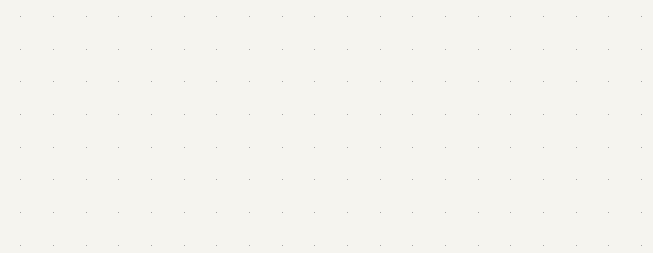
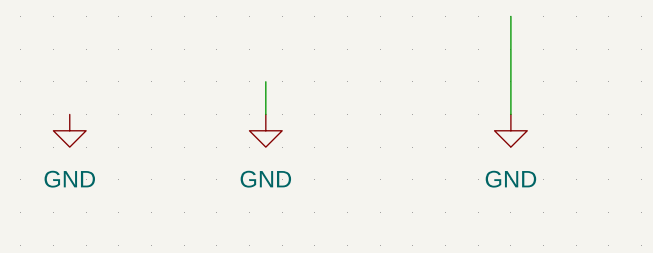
wire: none -> (510, 16) (510, 114)
wire: none -> (265, 81) (265, 114)
power symbol: none -> GND (69, 130)
power symbol: none -> GND (265, 130)
power symbol: none -> GND (510, 130)

